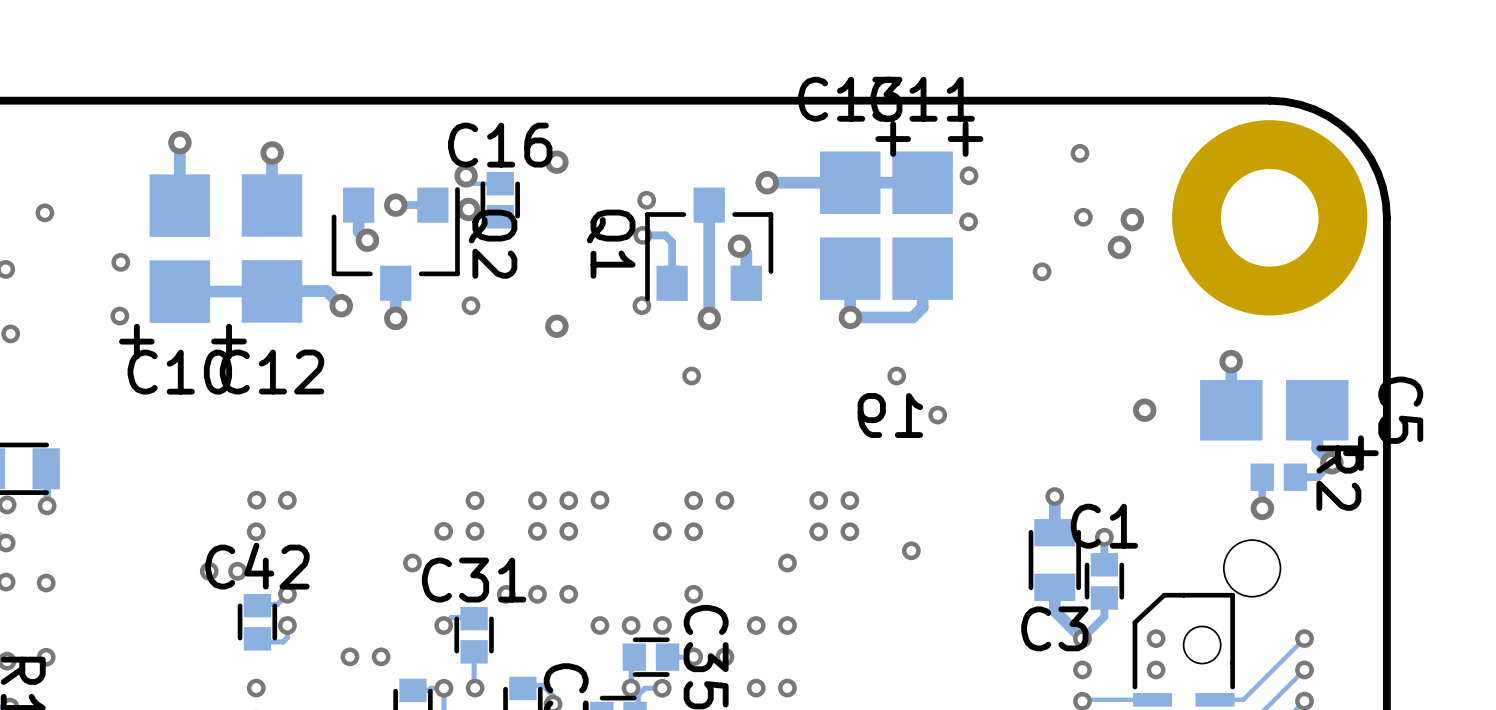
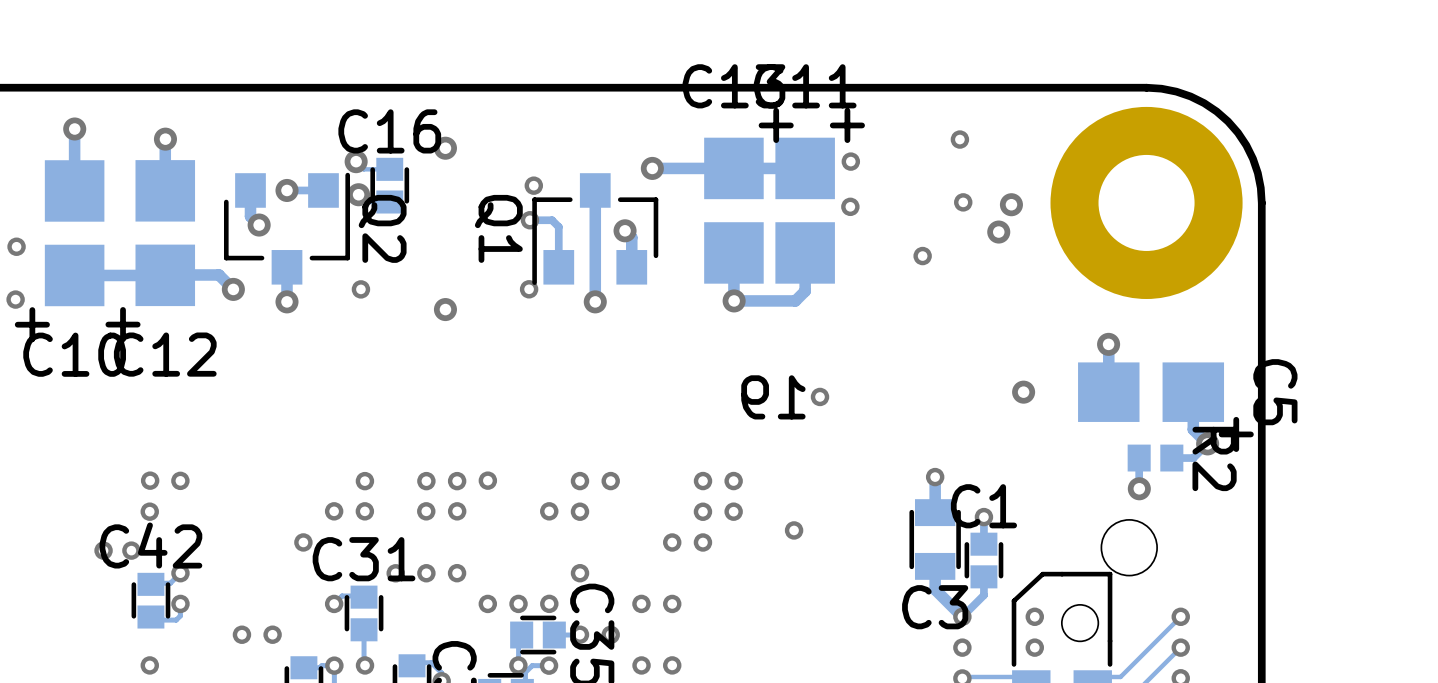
via: (691, 376) -> none
via: (896, 376) -> none
via: none -> (702, 542)

